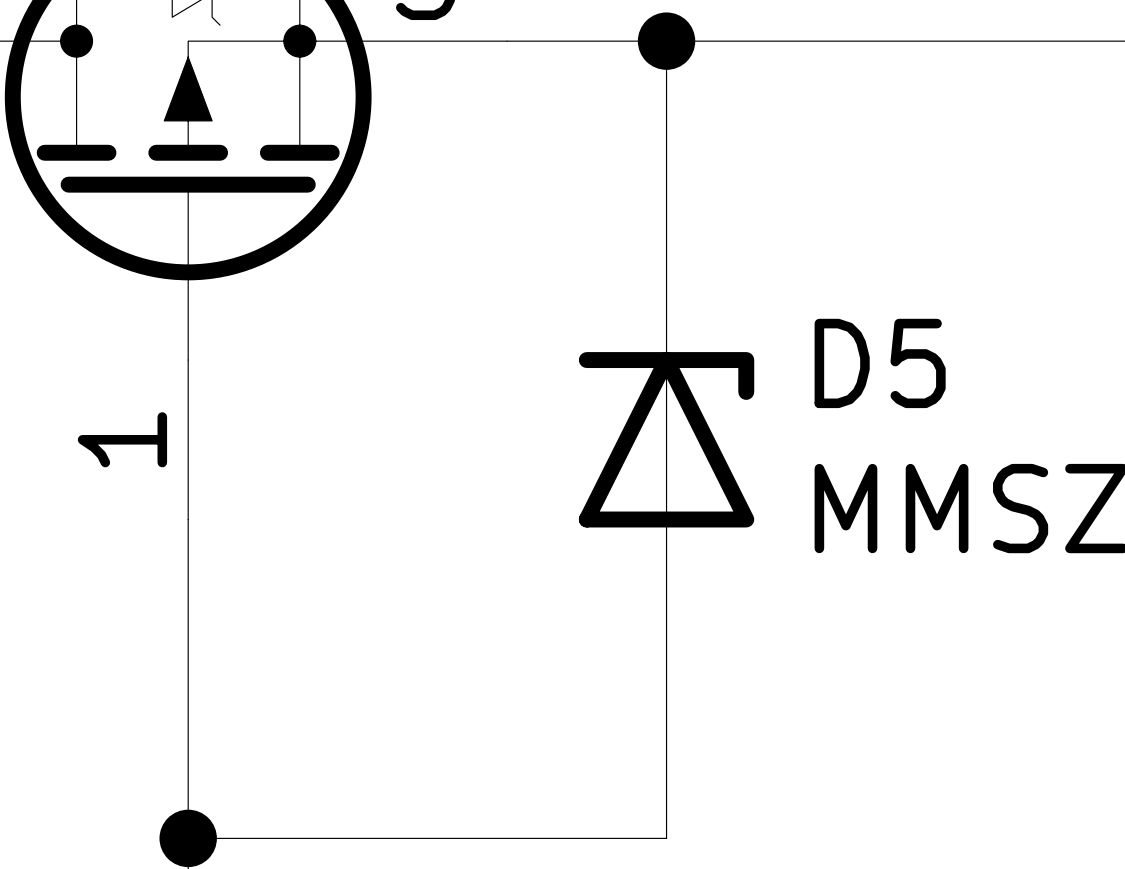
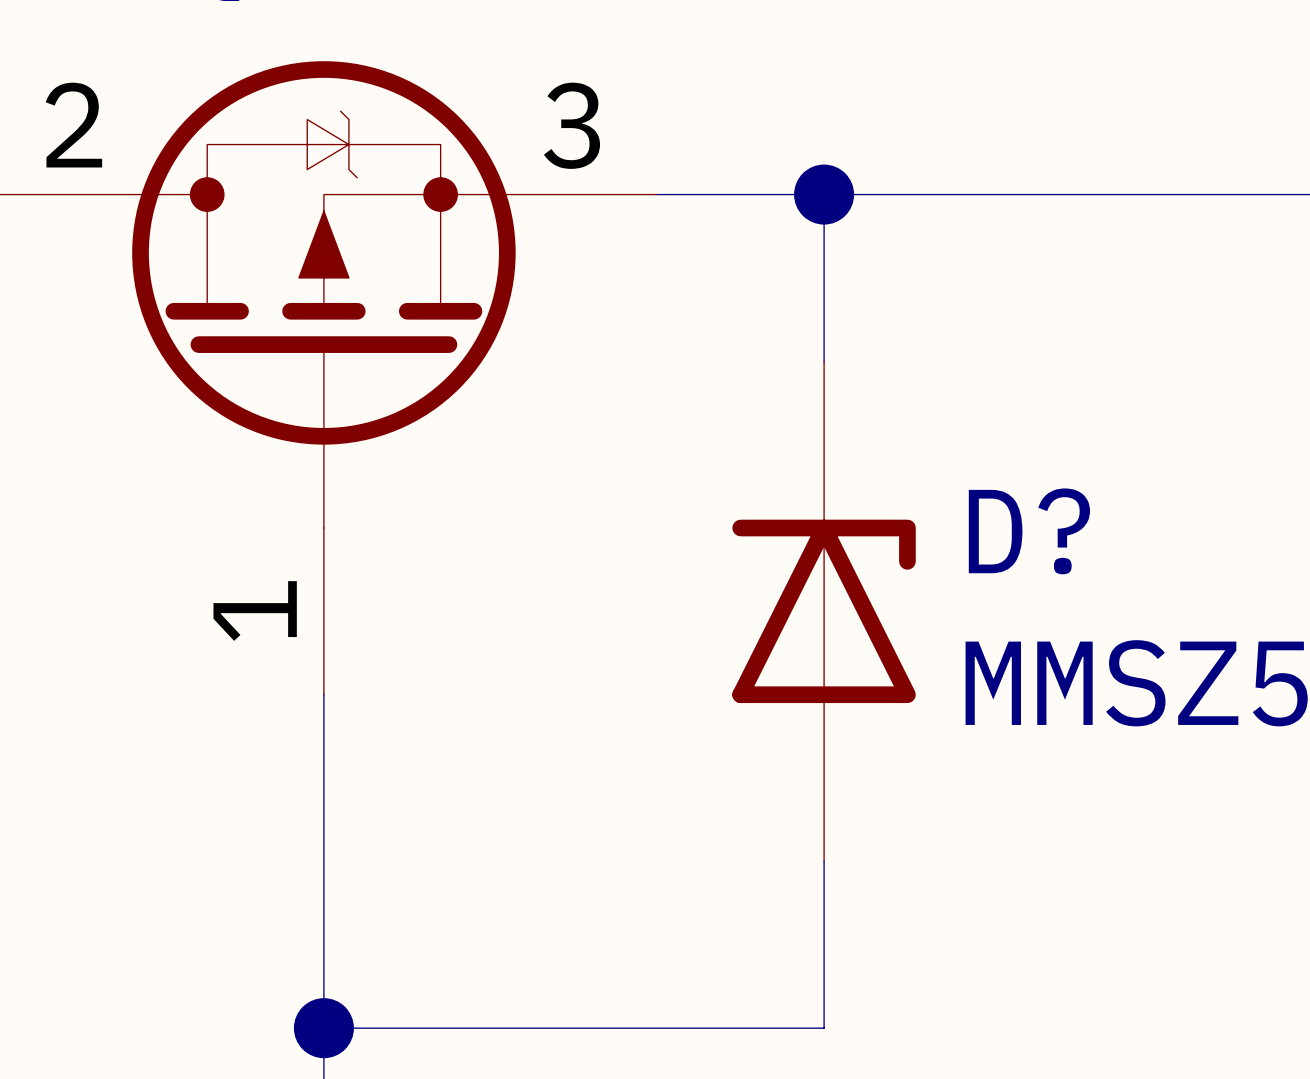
D5 name: D5 (880, 363) -> D? (1029, 531)

